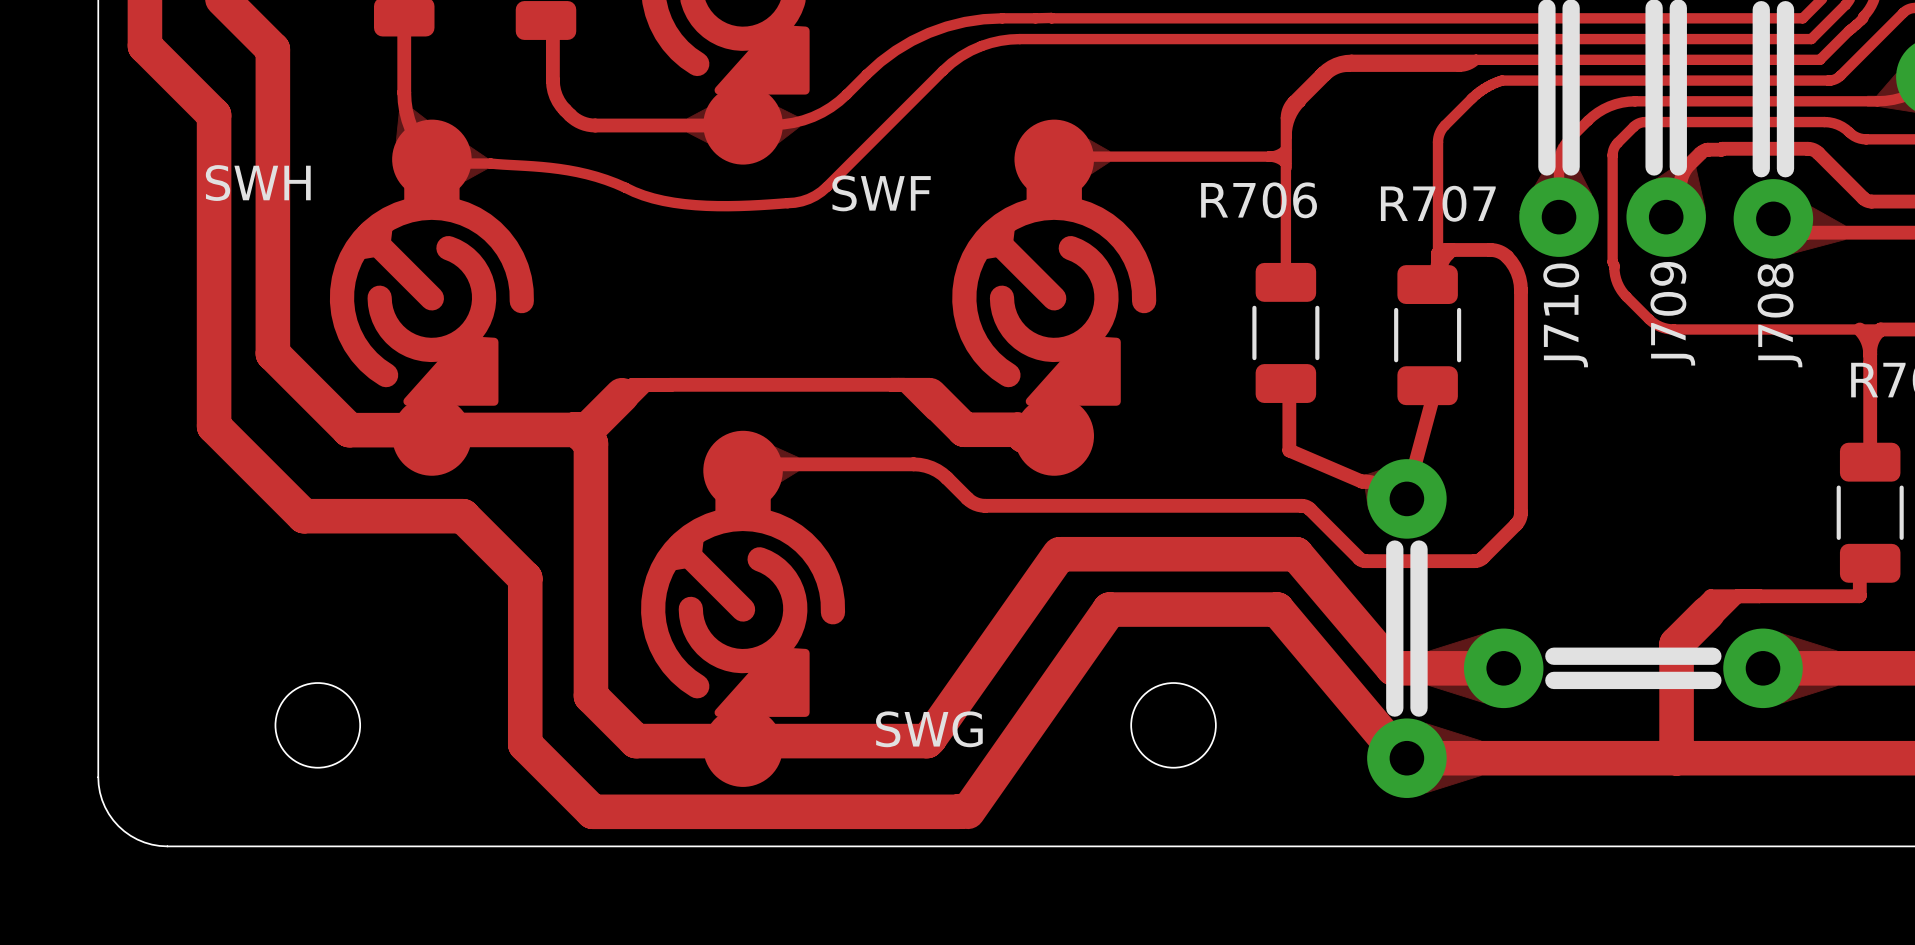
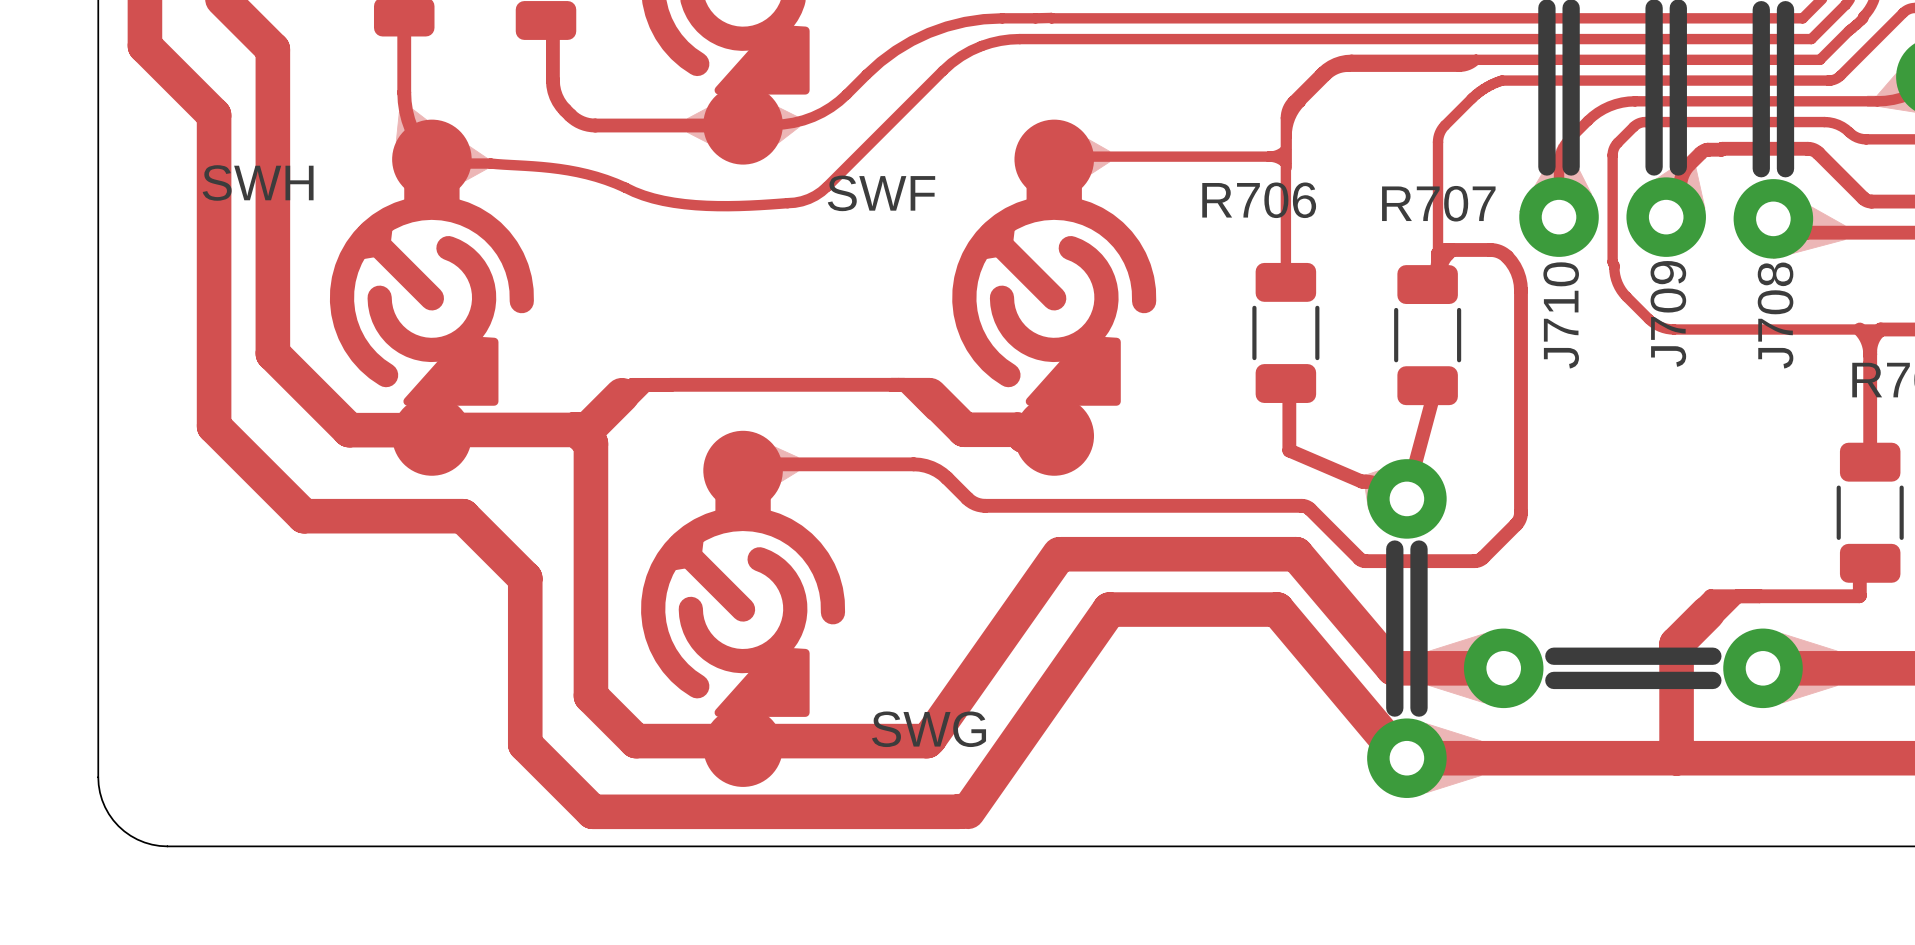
round board edge: [274, 682, 362, 769] -> none
round board edge: [1130, 682, 1217, 769] -> none

